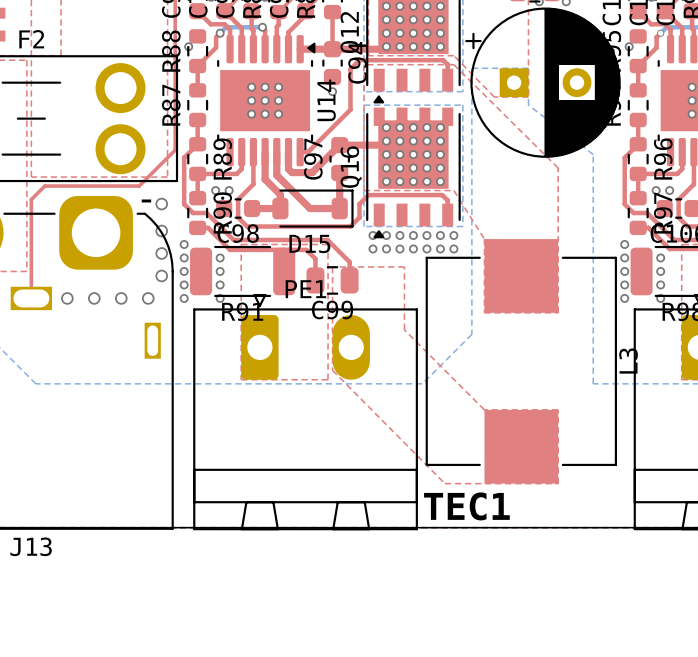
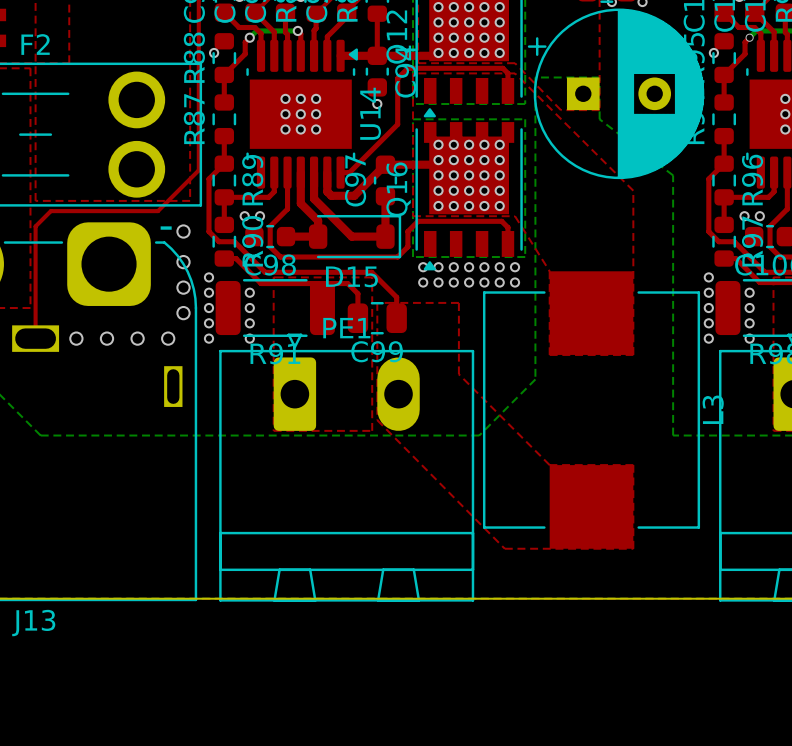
text: TEC1 (466, 506) -> none

